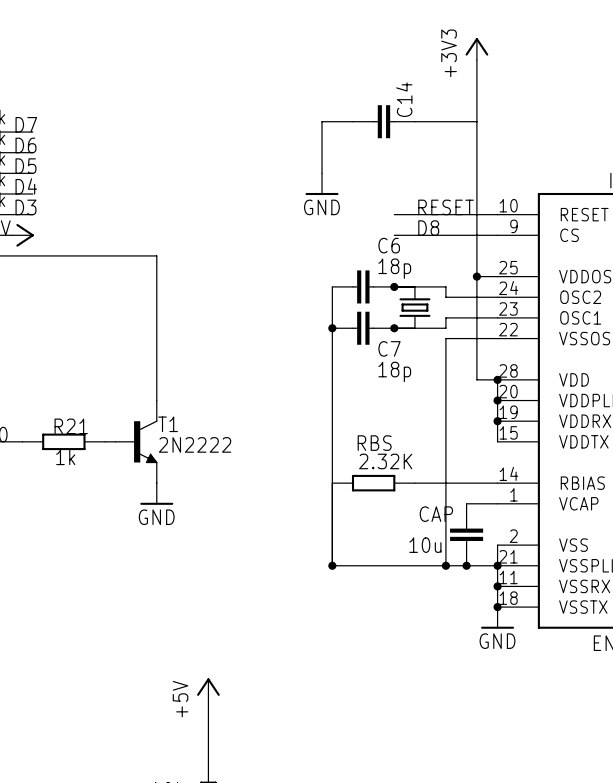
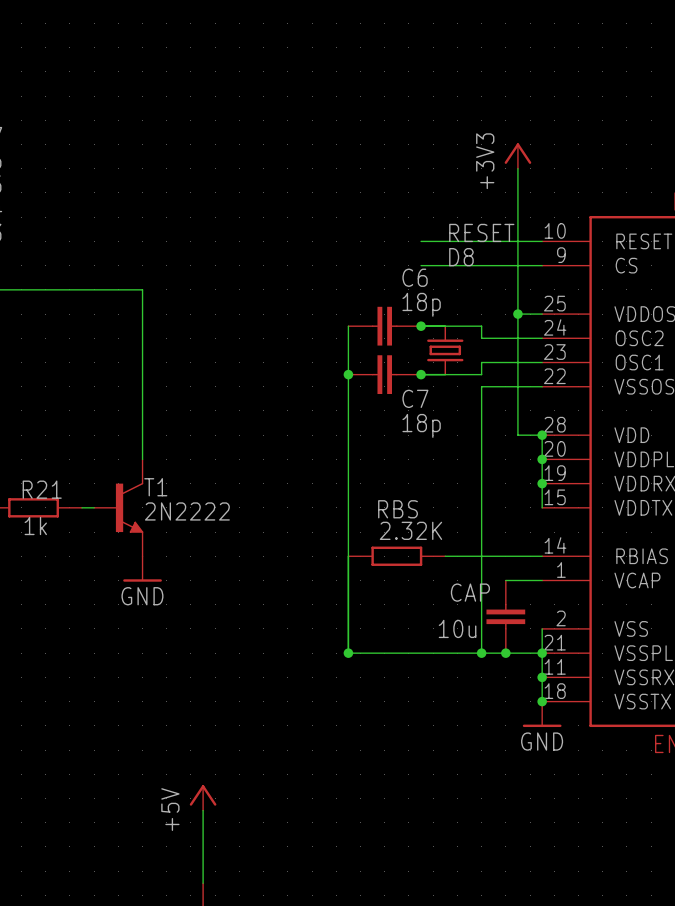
power symbol position: +3V3 (476, 48) -> +3V3 (517, 156)
wire: (476, 59) (476, 152) -> none
wire: (353, 121) (322, 121) (322, 173) -> none
C14: (383, 121) -> none
wire: (414, 121) (476, 121) -> none
power symbol: GND (322, 184) -> none

